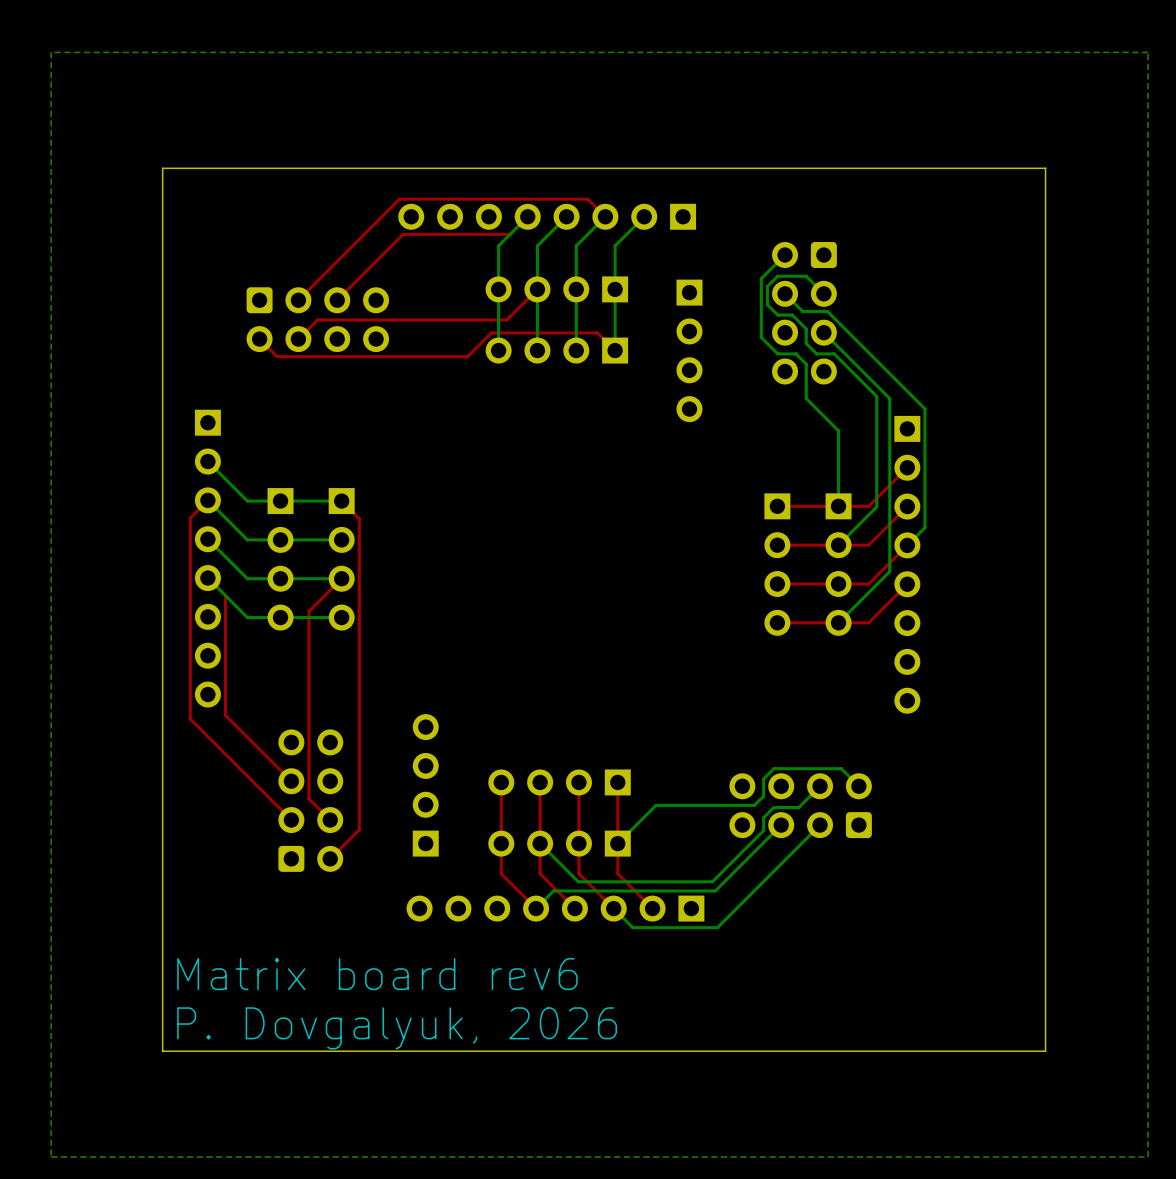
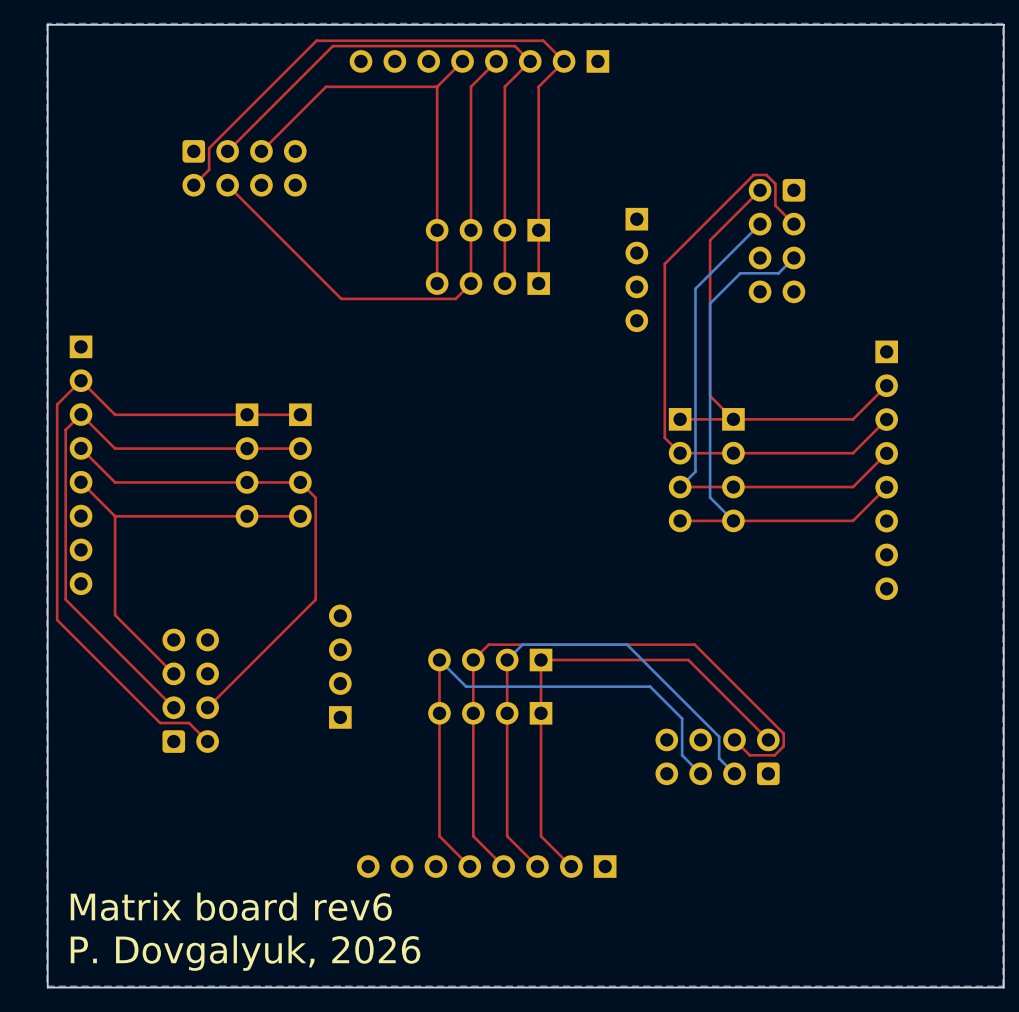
top track: none -> (462, 61) (437, 86)
top track: none -> (496, 61) (471, 86) (471, 283) (455, 298) (341, 298) (227, 185)
top track: none -> (437, 86) (326, 86) (261, 151)
top track: none -> (437, 86) (437, 283)
board edge: (1045, 168) (162, 168) (162, 1051) (1045, 1051) (1045, 168) -> (1003, 24) (1003, 987) (47, 987) (47, 24) (1003, 24)
top track: none -> (227, 151) (332, 46) (514, 46) (530, 61) (504, 86) (504, 283)
top track: (527, 216) (510, 234) (403, 234) (337, 300) -> none
bottom track: (527, 216) (498, 245) (498, 350) -> none
part position: (547, 216) -> (479, 61)
bottom track: (566, 216) (537, 245) (537, 350) -> none
top track: (605, 216) (587, 199) (399, 199) (298, 300) -> none
bottom track: (605, 216) (576, 245) (576, 350) -> none
bottom track: (644, 216) (615, 245) (615, 350) -> none
top track: none -> (760, 190) (710, 240) (710, 396) (733, 419)
bottom track: (785, 255) (761, 278) (761, 337) (777, 353) (795, 353) (806, 364) (806, 398) (838, 430) (838, 506) -> none
bottom track: none -> (760, 224) (695, 288) (695, 471) (680, 487)
top track: none -> (793, 224) (775, 205) (775, 183) (766, 174) (753, 174) (664, 263) (664, 437) (680, 453)
top track: (537, 289) (506, 319) (317, 319) (298, 339) -> none
bottom track: (785, 293) (802, 311) (827, 311) (924, 408) (924, 527) (907, 545) -> none
bottom track: (823, 293) (806, 276) (777, 276) (767, 286) (767, 304) (777, 315) (792, 315) (806, 329) (806, 343) (816, 353) (834, 353) (876, 396) (876, 506) (838, 545) -> none
part position: (804, 313) -> (777, 241)
part position: (317, 319) -> (244, 168)
bottom track: (823, 332) (889, 398) (889, 571) (838, 622) -> (793, 257) (778, 273) (740, 273) (710, 303) (710, 497) (733, 520)
top track: (259, 339) (277, 356) (467, 356) (491, 332) (597, 332) (615, 350) -> (193, 185) (209, 169) (209, 148) (316, 40) (543, 40) (564, 61) (538, 86) (538, 283)
part position: (689, 350) -> (636, 269)
bottom track: (207, 461) (247, 501) (341, 501) -> none
top track: (907, 467) (868, 506) -> (886, 385) (853, 419) (759, 419)
top track: (207, 500) (190, 517) (190, 718) (291, 820) -> none
bottom track: (207, 500) (247, 539) (341, 539) -> none
top track: (341, 501) (359, 518) (359, 596) -> (81, 448) (115, 482) (300, 482) (315, 497)
top track: none -> (300, 414) (115, 414) (81, 380) (57, 404) (57, 620) (160, 723) (189, 723) (207, 741)
top track: (907, 506) (868, 545) -> (886, 419) (853, 453) (759, 453)
bottom track: (207, 539) (247, 578) (341, 578) -> none
top track: none -> (300, 448) (115, 448) (81, 414) (65, 429) (65, 599) (173, 707)
top track: (907, 545) (868, 584) -> (886, 453) (853, 487) (759, 487)
part position: (207, 558) -> (81, 465)
part position: (907, 564) -> (886, 470)
top track: none -> (81, 482) (115, 516)
top track: (207, 578) (225, 595) (225, 715) (291, 781) -> none
bottom track: (207, 578) (247, 617) (341, 617) -> none
top track: (341, 578) (308, 611) (308, 798) (330, 820) -> none
top track: (907, 584) (868, 622) -> (886, 487) (853, 520) (759, 520)
top track: none -> (115, 516) (115, 615) (173, 673)
top track: none -> (300, 516) (115, 516)
top track: (359, 713) (359, 829) (330, 858) -> (315, 599) (207, 707)
bottom track: none -> (439, 660) (466, 686) (650, 686) (682, 718) (682, 755) (700, 773)
top track: none -> (473, 660) (488, 644) (694, 644) (783, 733) (783, 746) (774, 755) (749, 755) (734, 739)
bottom track: none -> (507, 660) (522, 644) (627, 644) (719, 736) (719, 758) (734, 773)
top track: none -> (541, 660) (688, 660) (768, 739)
part position: (425, 785) -> (340, 666)
bottom track: (820, 786) (798, 807) (773, 807) (763, 817) (763, 830) (712, 881) (578, 881) (540, 843) -> none
bottom track: (858, 786) (841, 768) (773, 768) (763, 778) (763, 796) (754, 805) (656, 805) (617, 843) -> none
part position: (310, 800) -> (190, 690)
part position: (800, 805) -> (717, 756)
bottom track: (781, 825) (715, 890) (553, 890) (536, 908) -> none
bottom track: (820, 825) (717, 927) (632, 927) (613, 908) -> none
top track: (501, 873) (536, 908) -> (439, 739) (439, 836) (469, 866)
top track: (540, 873) (574, 908) -> (473, 739) (473, 836) (503, 866)
top track: (578, 873) (613, 908) -> (507, 739) (507, 836) (537, 866)
top track: (617, 873) (652, 908) -> (541, 739) (541, 836) (571, 866)
part position: (555, 908) -> (486, 866)
text position: Matrix board rev6 (377, 974) -> Matrix board rev6 (231, 906)
text position: P. Dovgalyuk, 2026 (397, 1028) -> P. Dovgalyuk, 2026 (245, 953)

